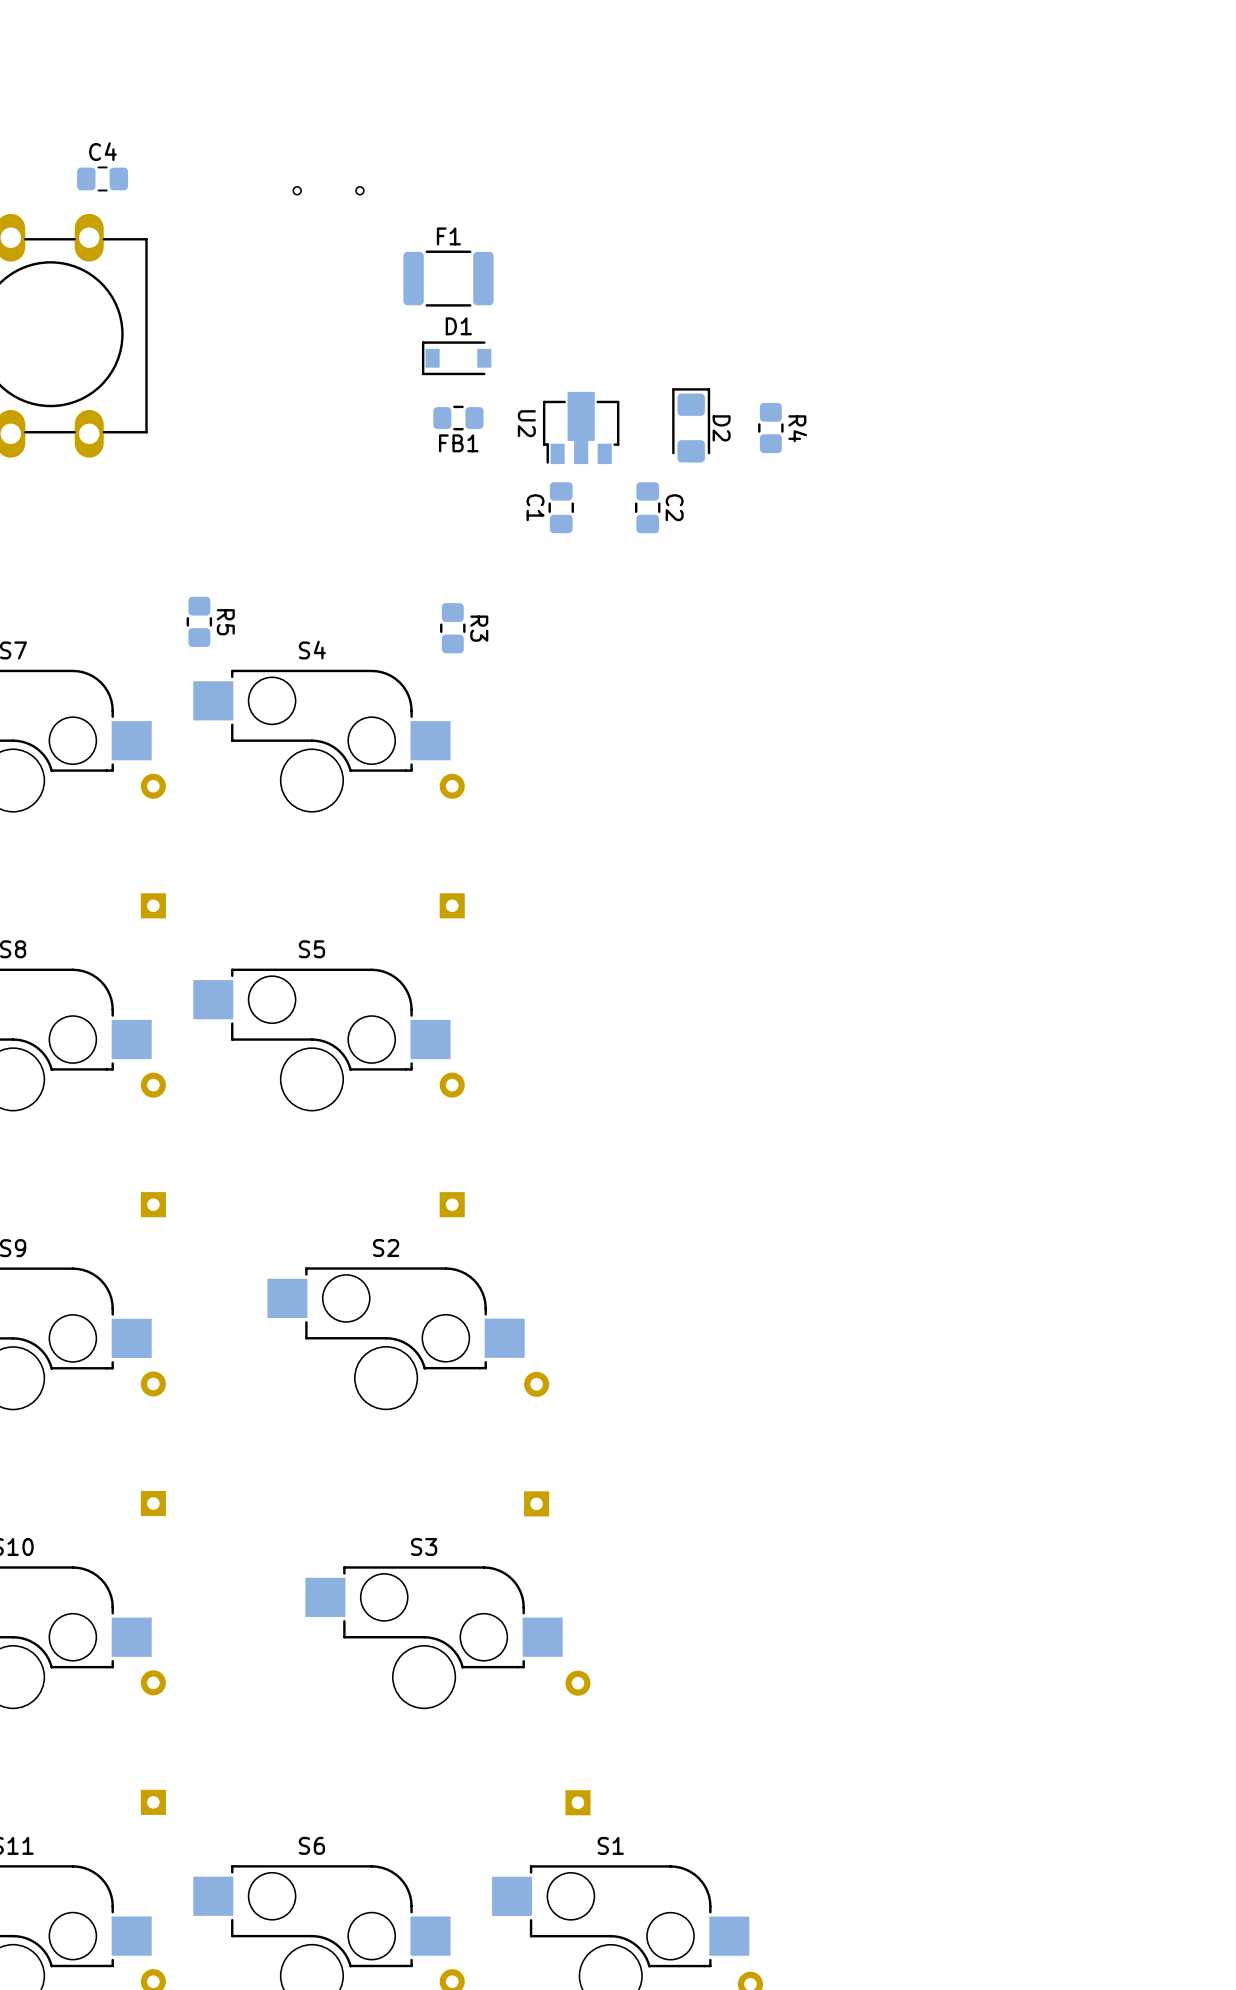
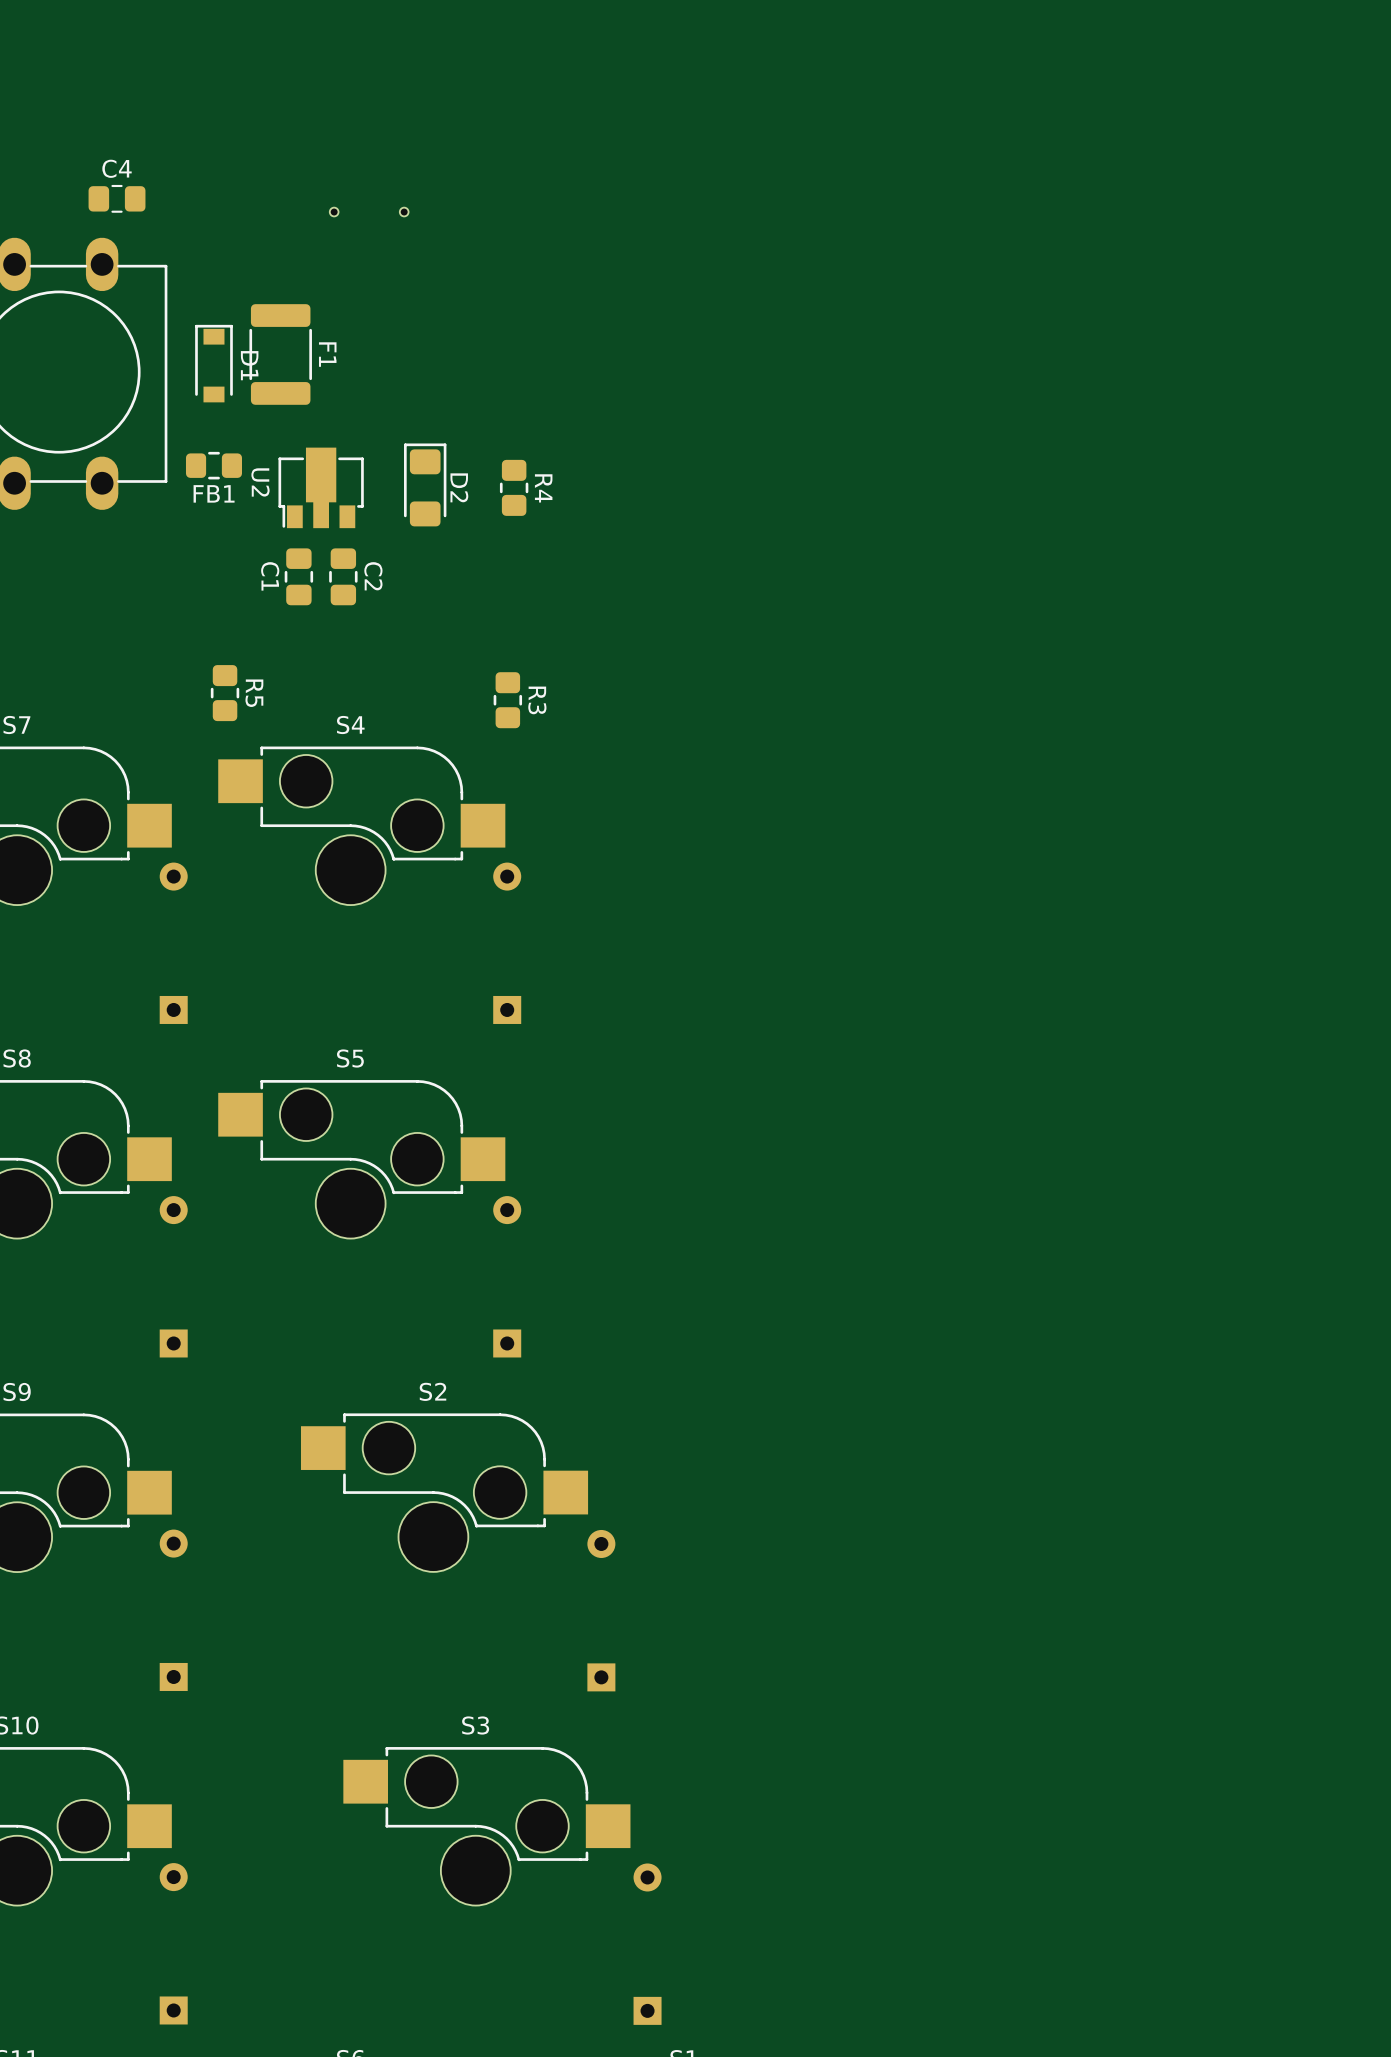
F1 rotation: 0° (448, 278) -> 90° clockwise (280, 354)
F1 position: (448, 278) -> (280, 354)
D1 rotation: 0° (456, 358) -> 90° clockwise (213, 363)
D1 position: (456, 358) -> (213, 363)
FB1 position: (458, 418) -> (213, 465)
D2 position: (691, 425) -> (425, 484)
U2 position: (581, 428) -> (321, 487)
R4 position: (770, 428) -> (514, 487)
C1 position: (561, 507) -> (298, 576)
C2 position: (647, 507) -> (343, 576)

